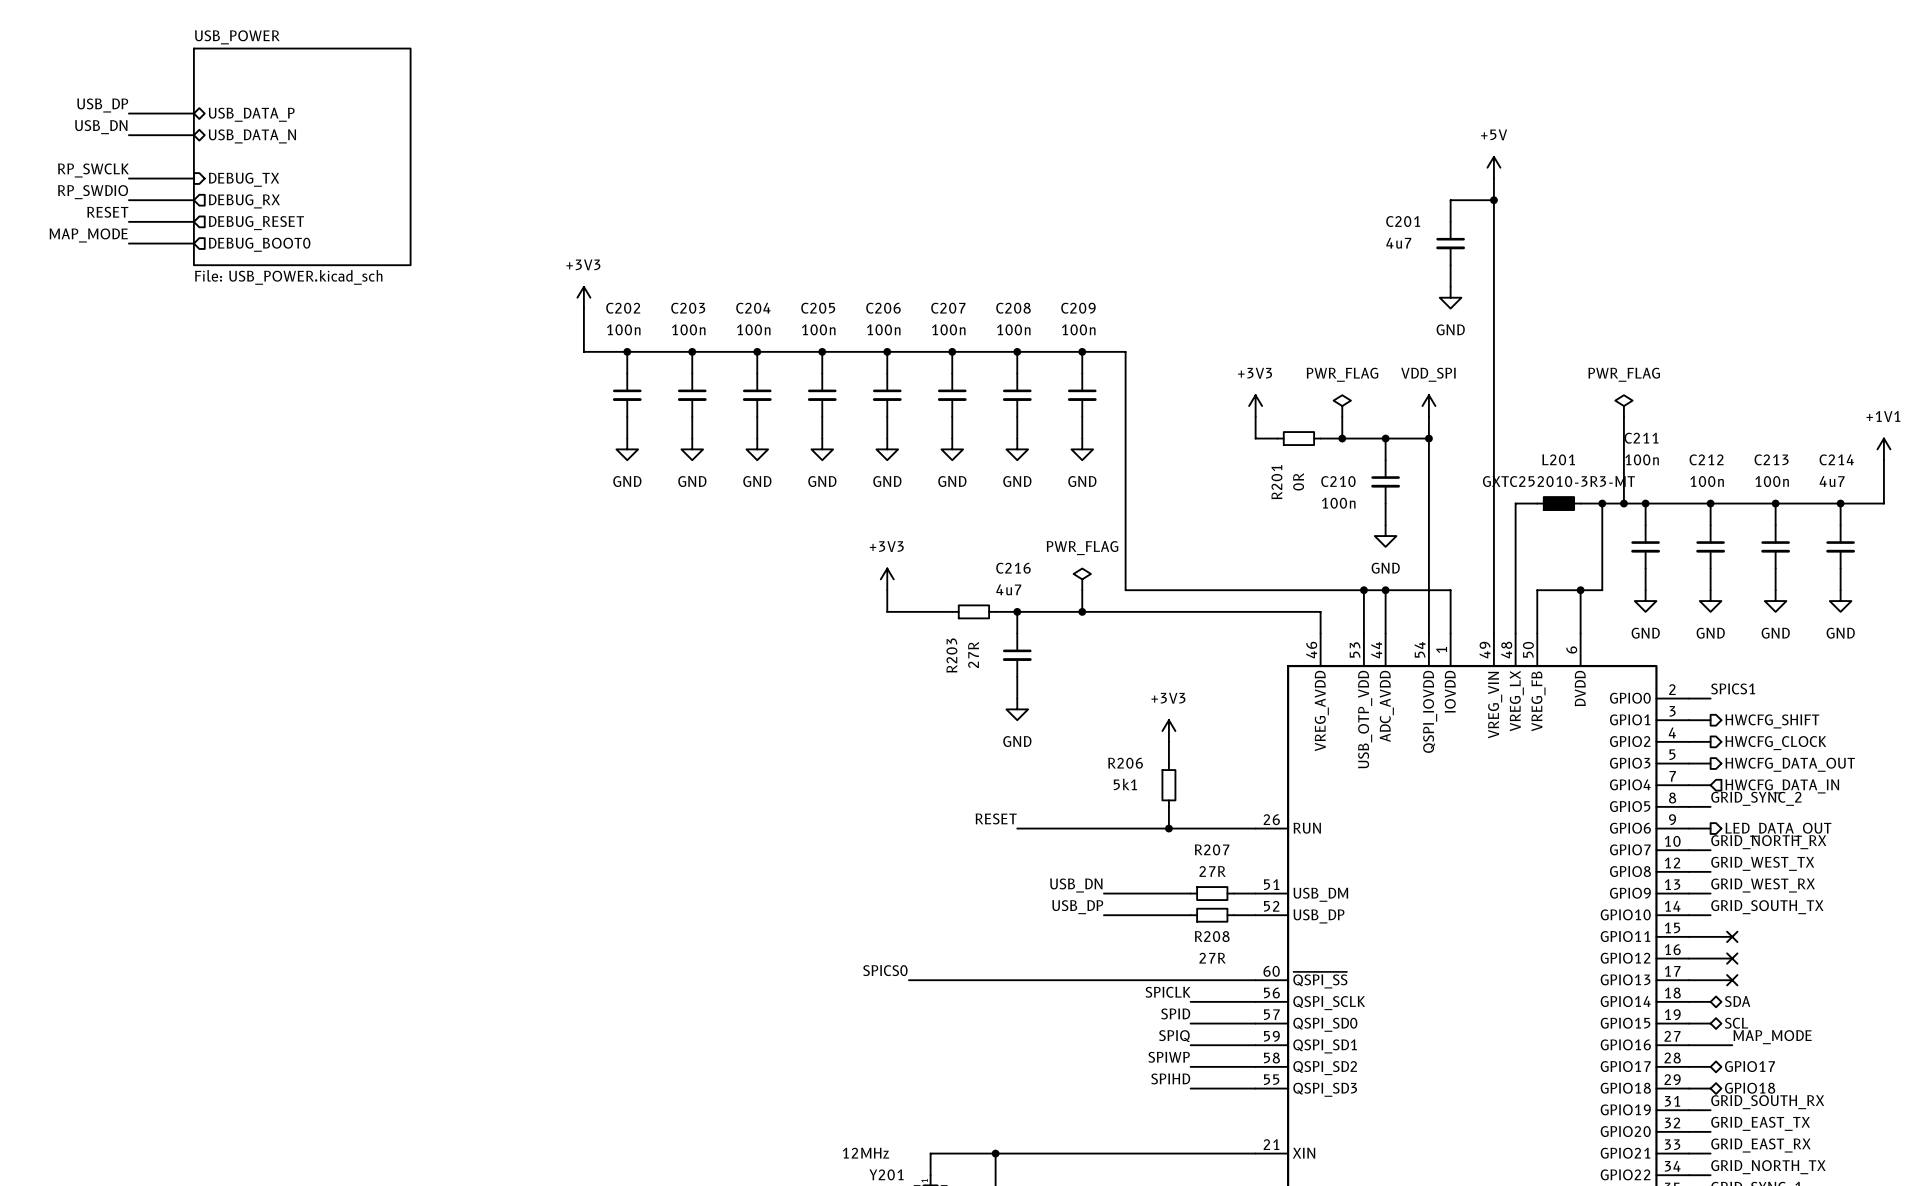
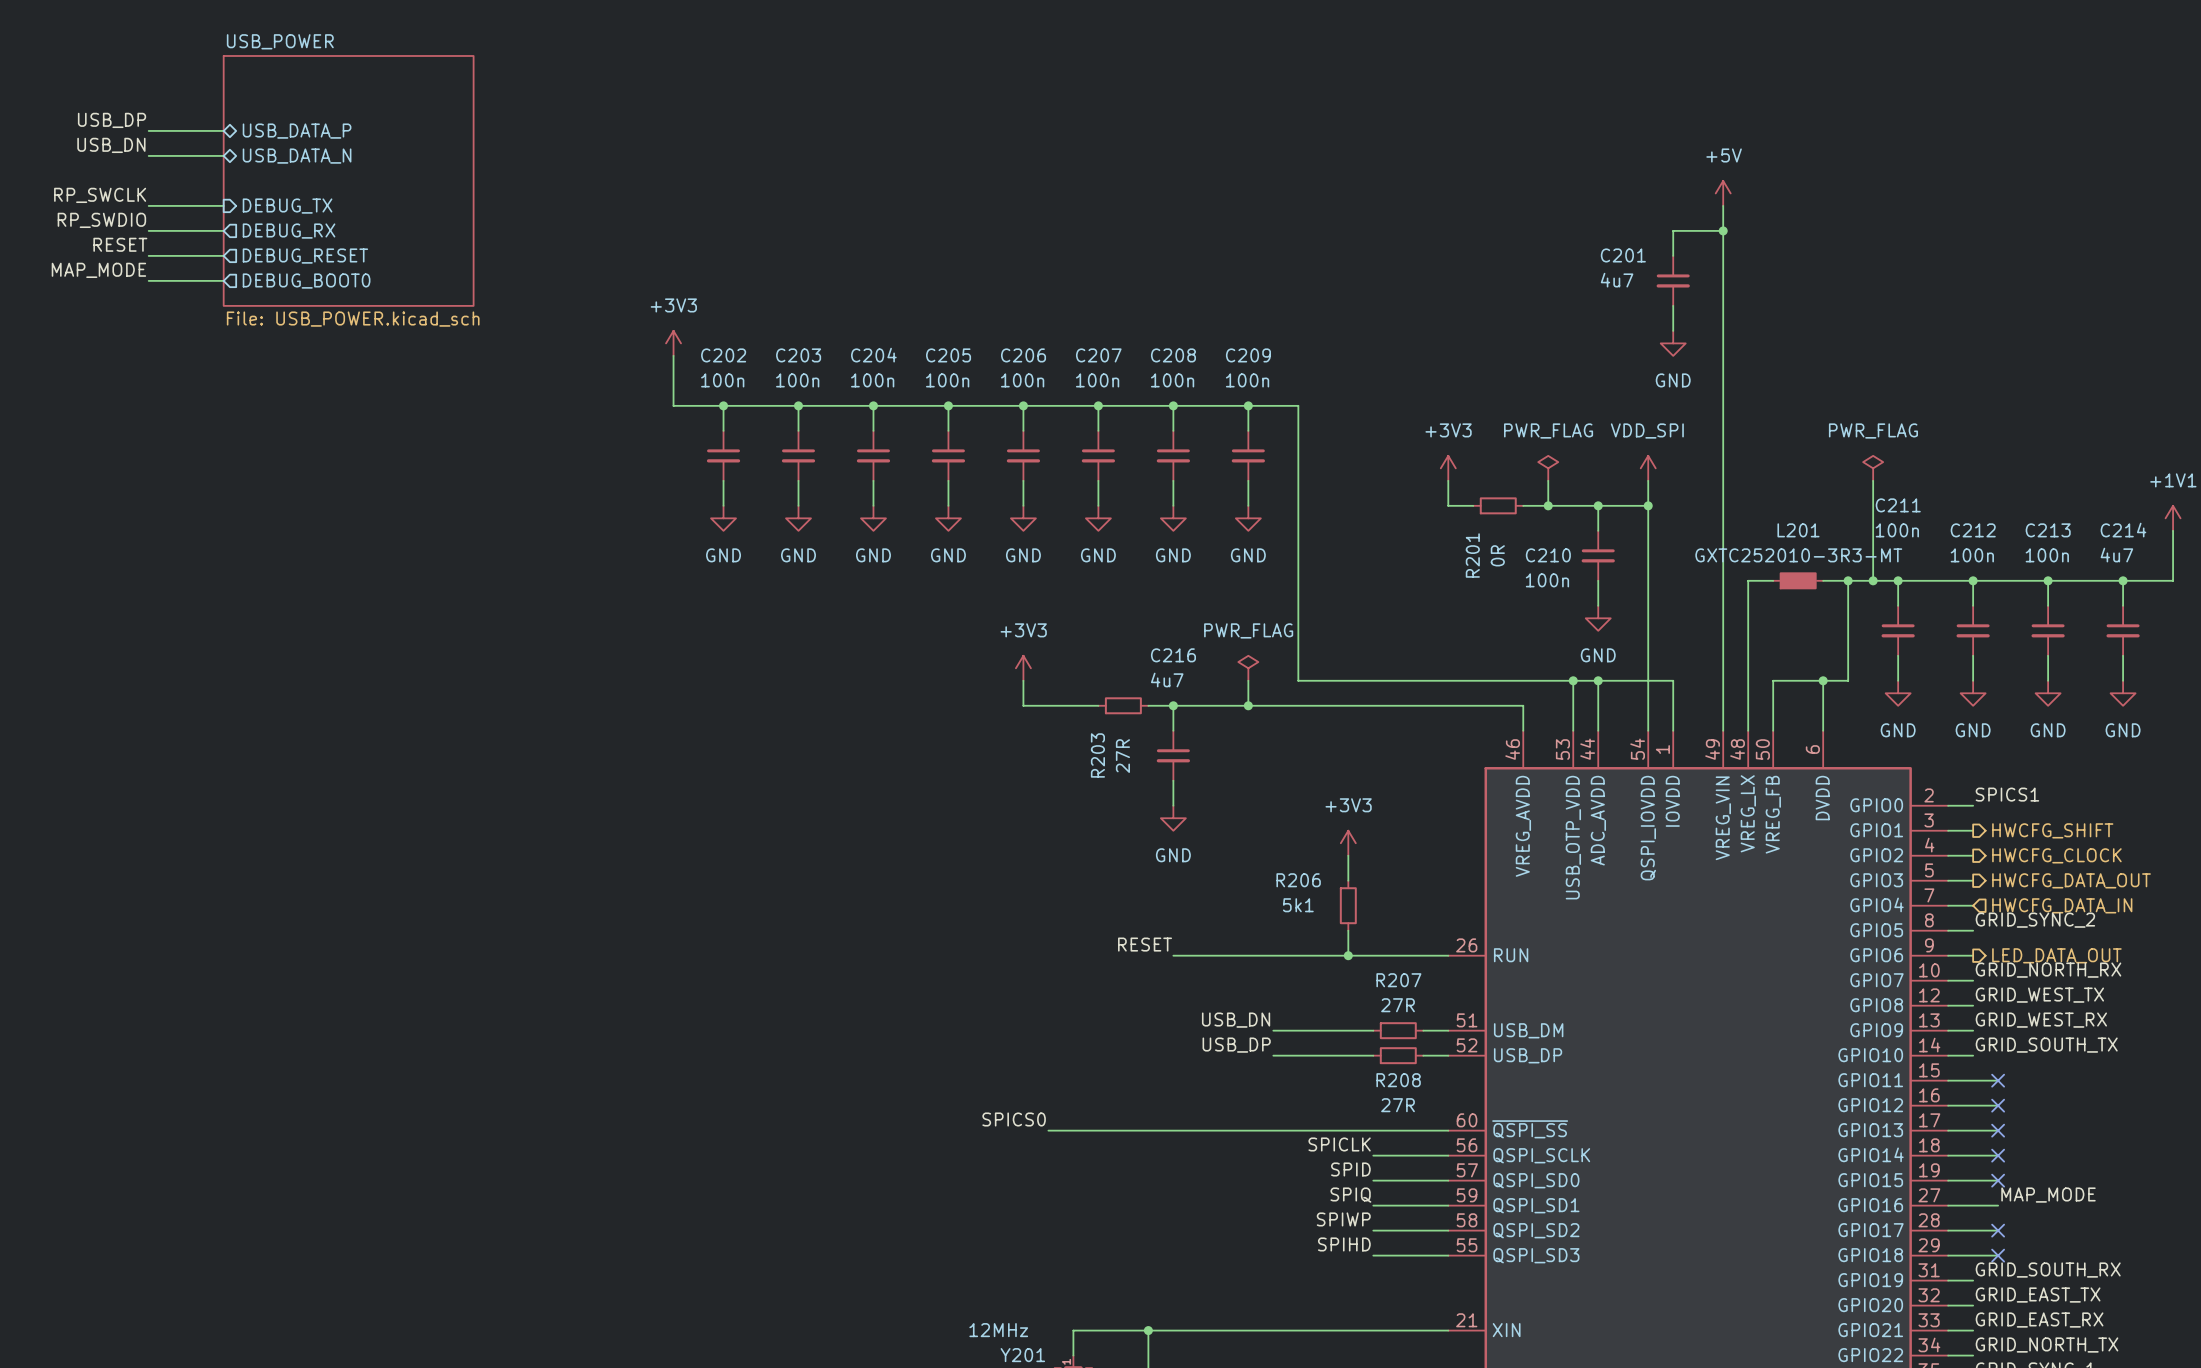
wire: none -> (1973, 1155) (1998, 1155)
no-connect mark: none -> (1998, 1155)
hierarchical label: SDA (1737, 1001) -> none
wire: none -> (1973, 1180) (1998, 1180)
no-connect mark: none -> (1998, 1180)
hierarchical label: SCL (1736, 1023) -> none
wire: none -> (1973, 1230) (1998, 1230)
no-connect mark: none -> (1998, 1230)
hierarchical label: GPIO17 (1749, 1066) -> none
wire: none -> (1973, 1255) (1998, 1255)
no-connect mark: none -> (1998, 1255)
hierarchical label: GPIO18 (1750, 1088) -> none

